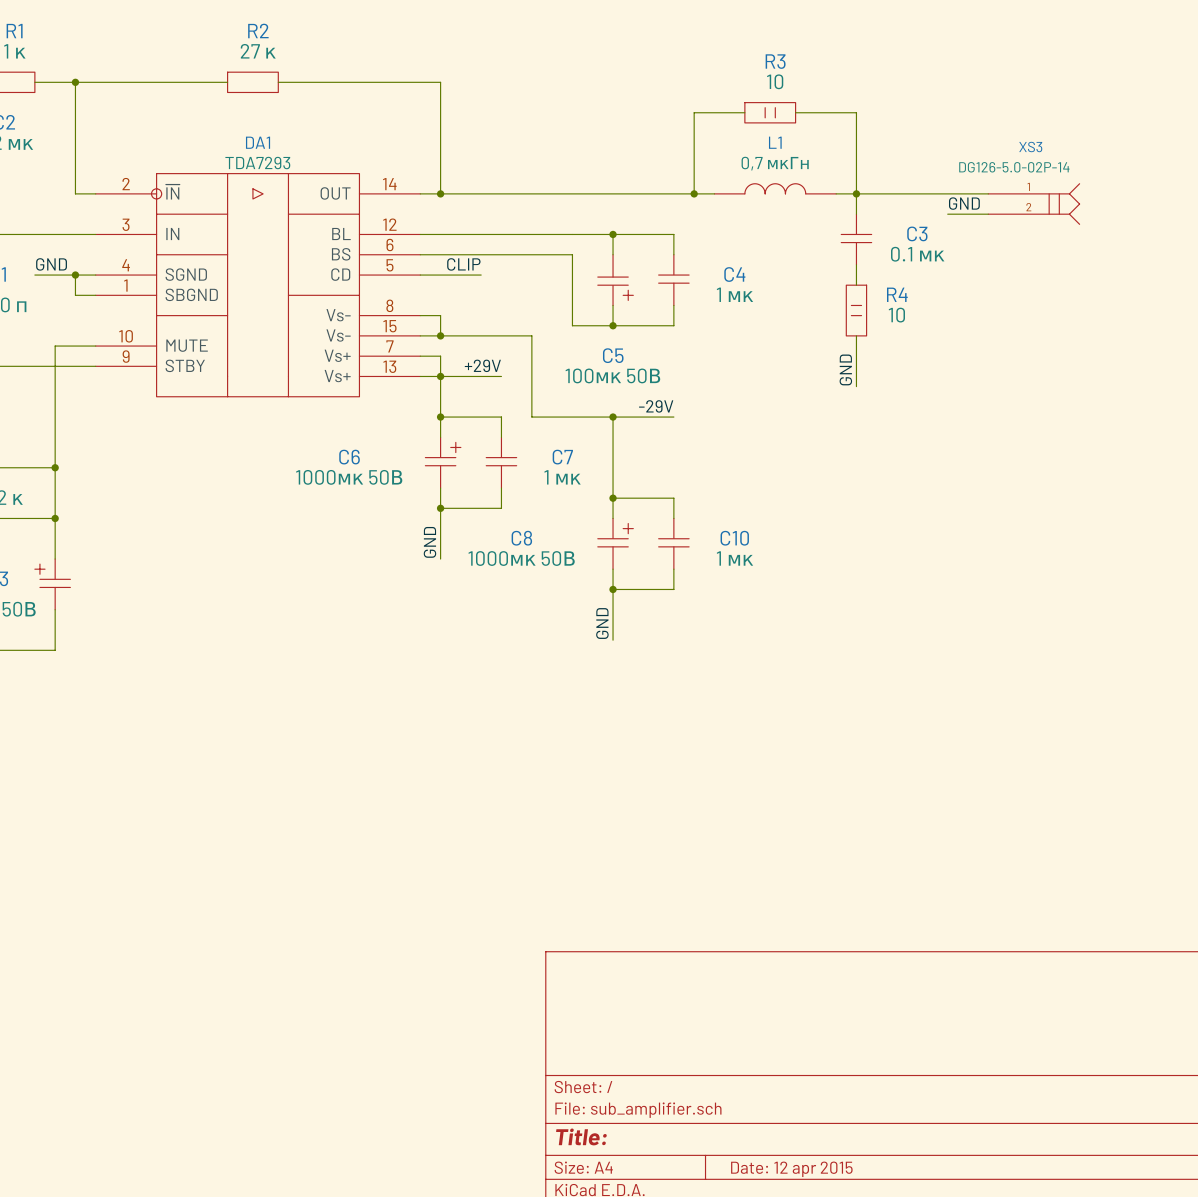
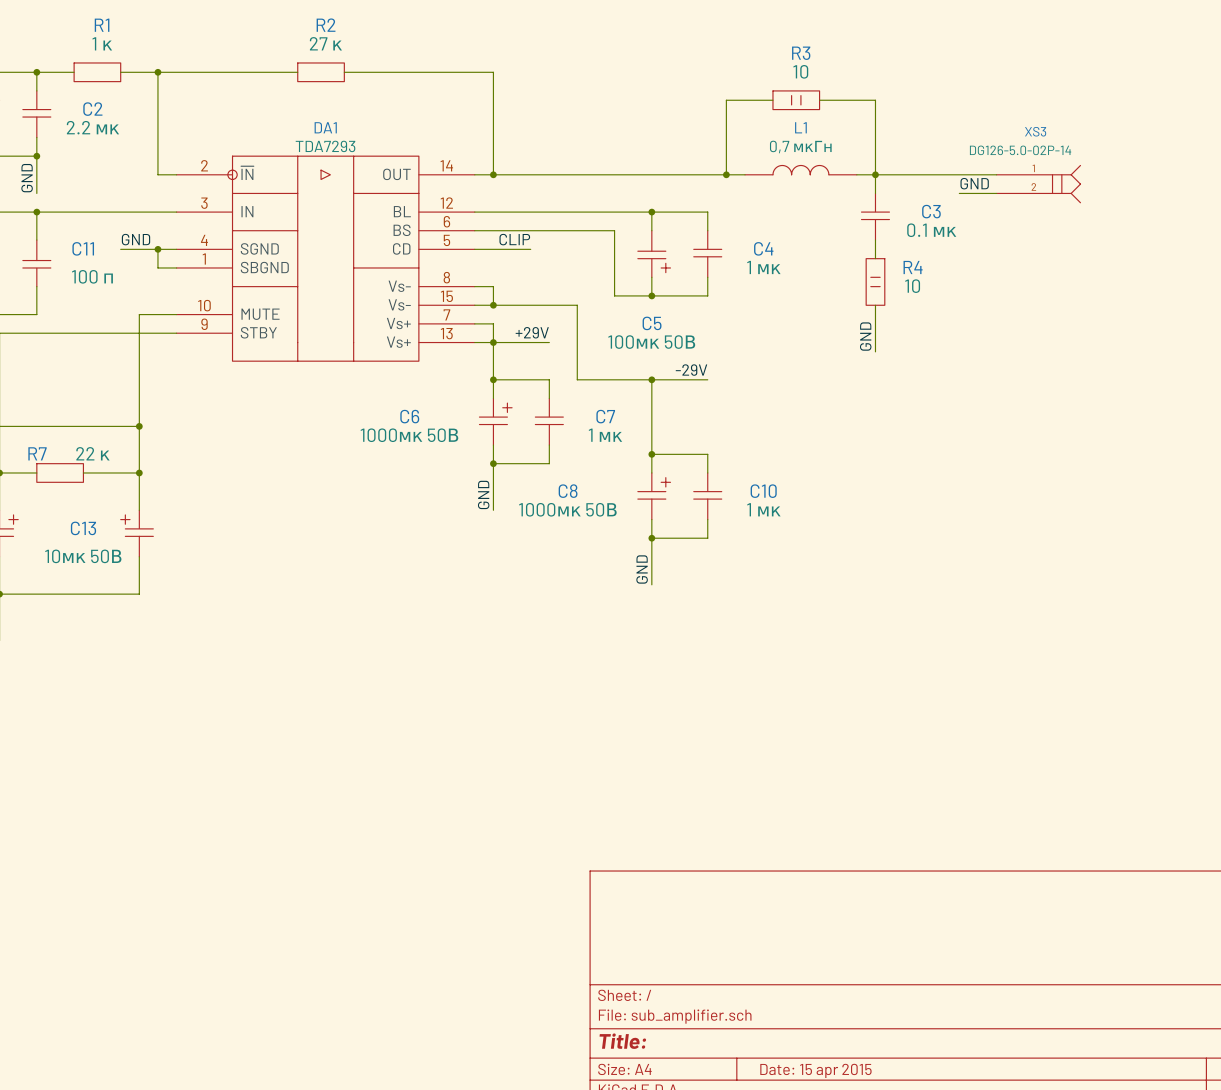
title block: Date: 12 apr 2015 (791, 1169) -> Date: 15 apr 2015 (815, 1070)

